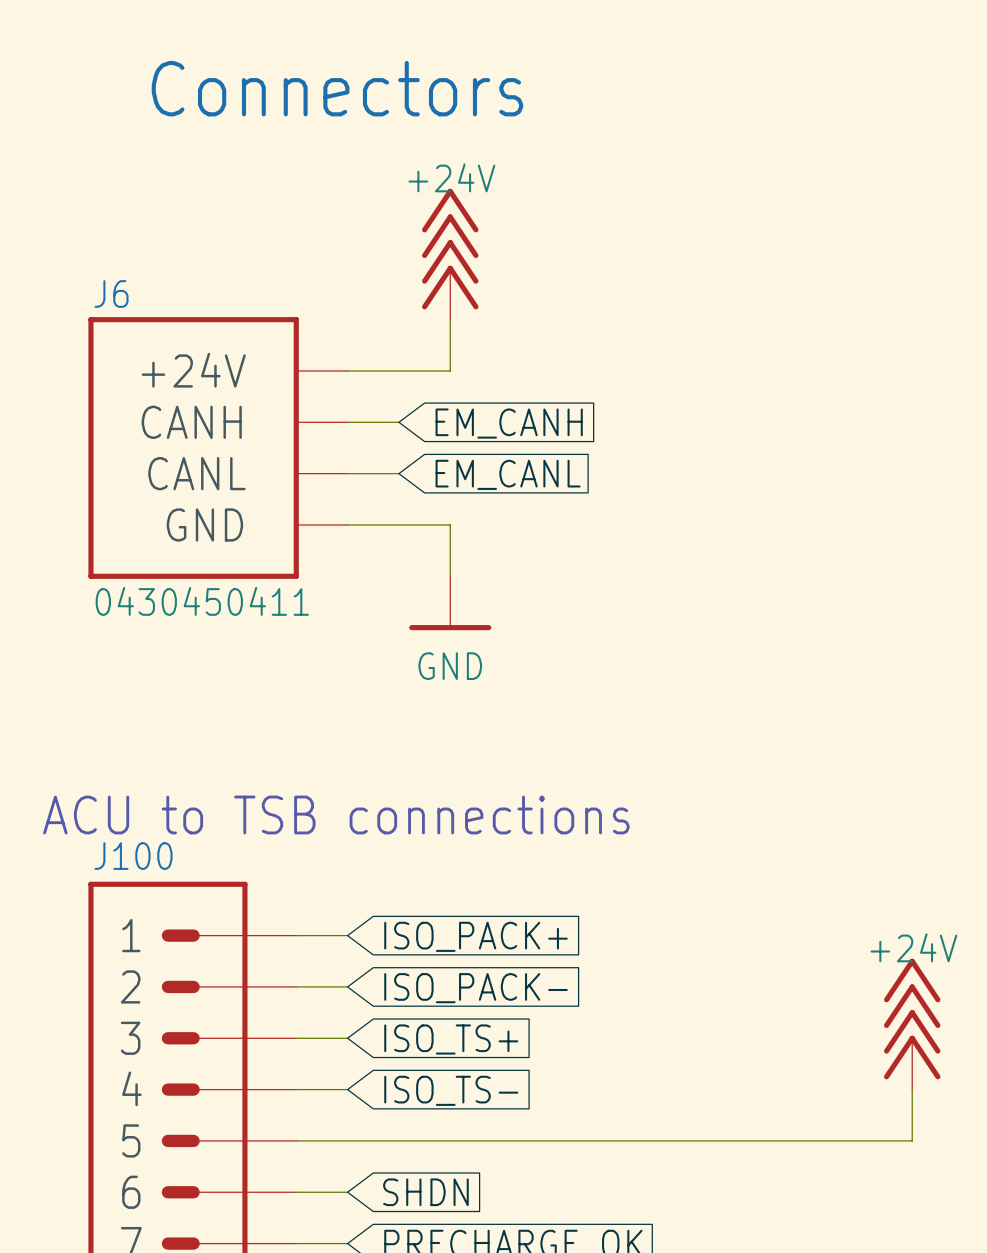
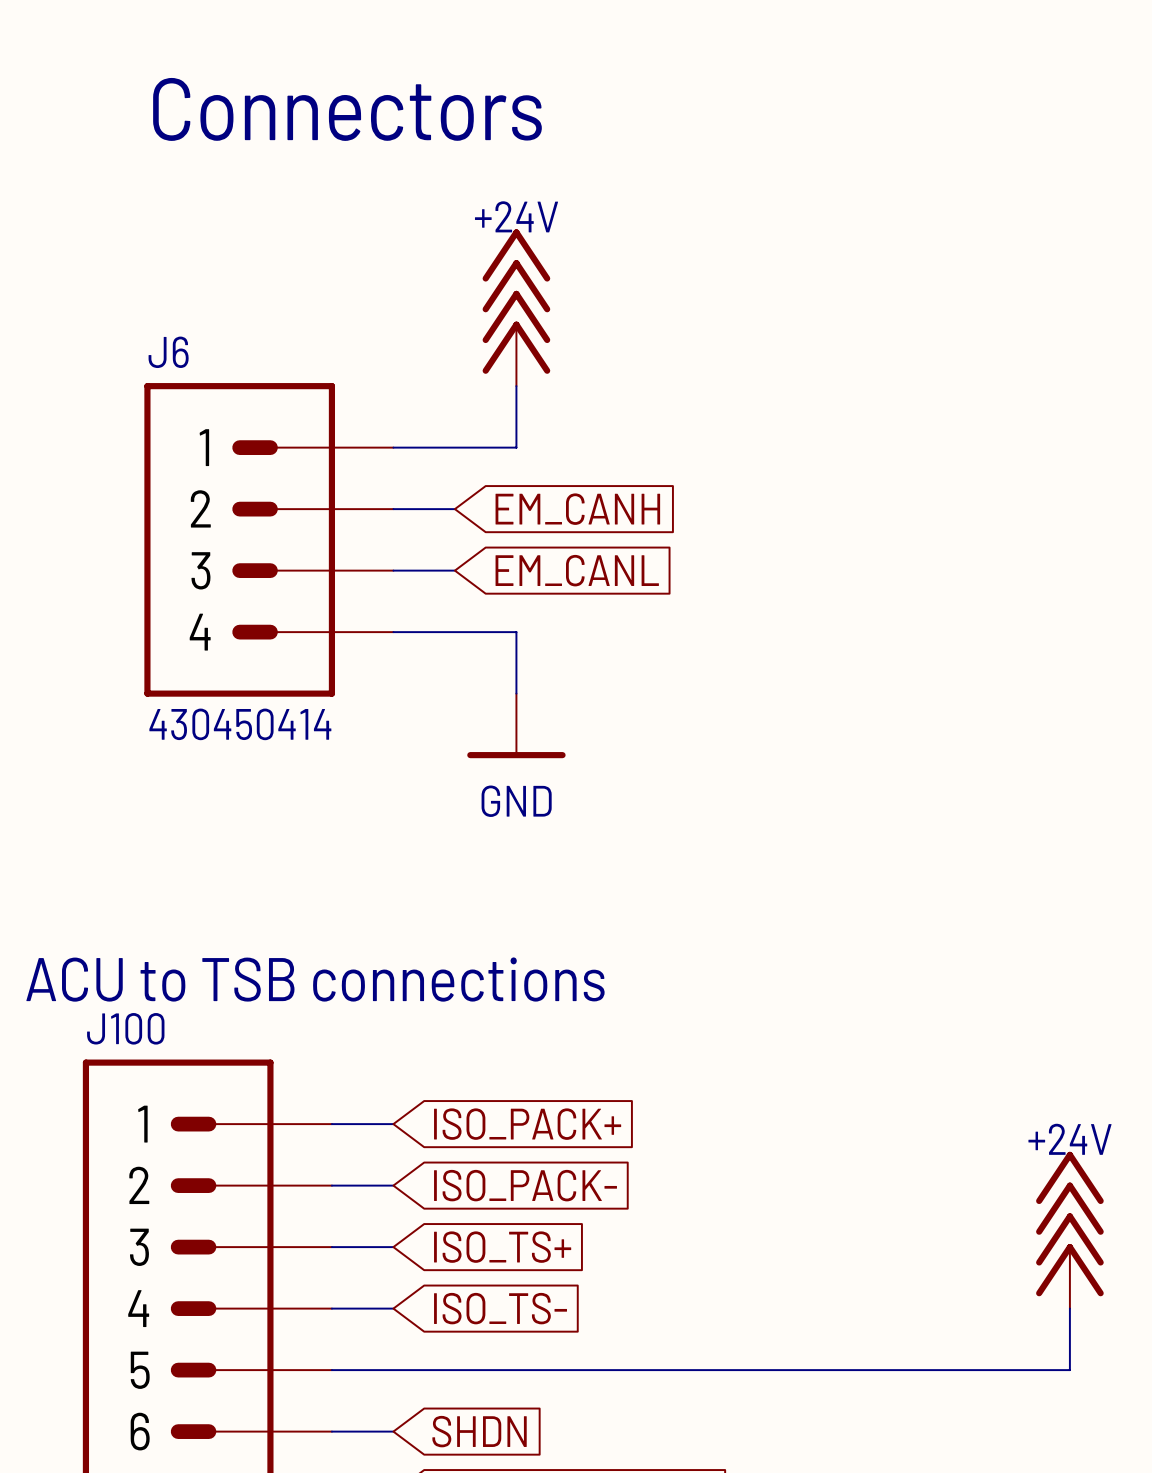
J6 symbol: [88, 317, 348, 579] -> [144, 383, 394, 697]
J6 text: 0430450411 (202, 601) -> 430450414 (240, 724)

